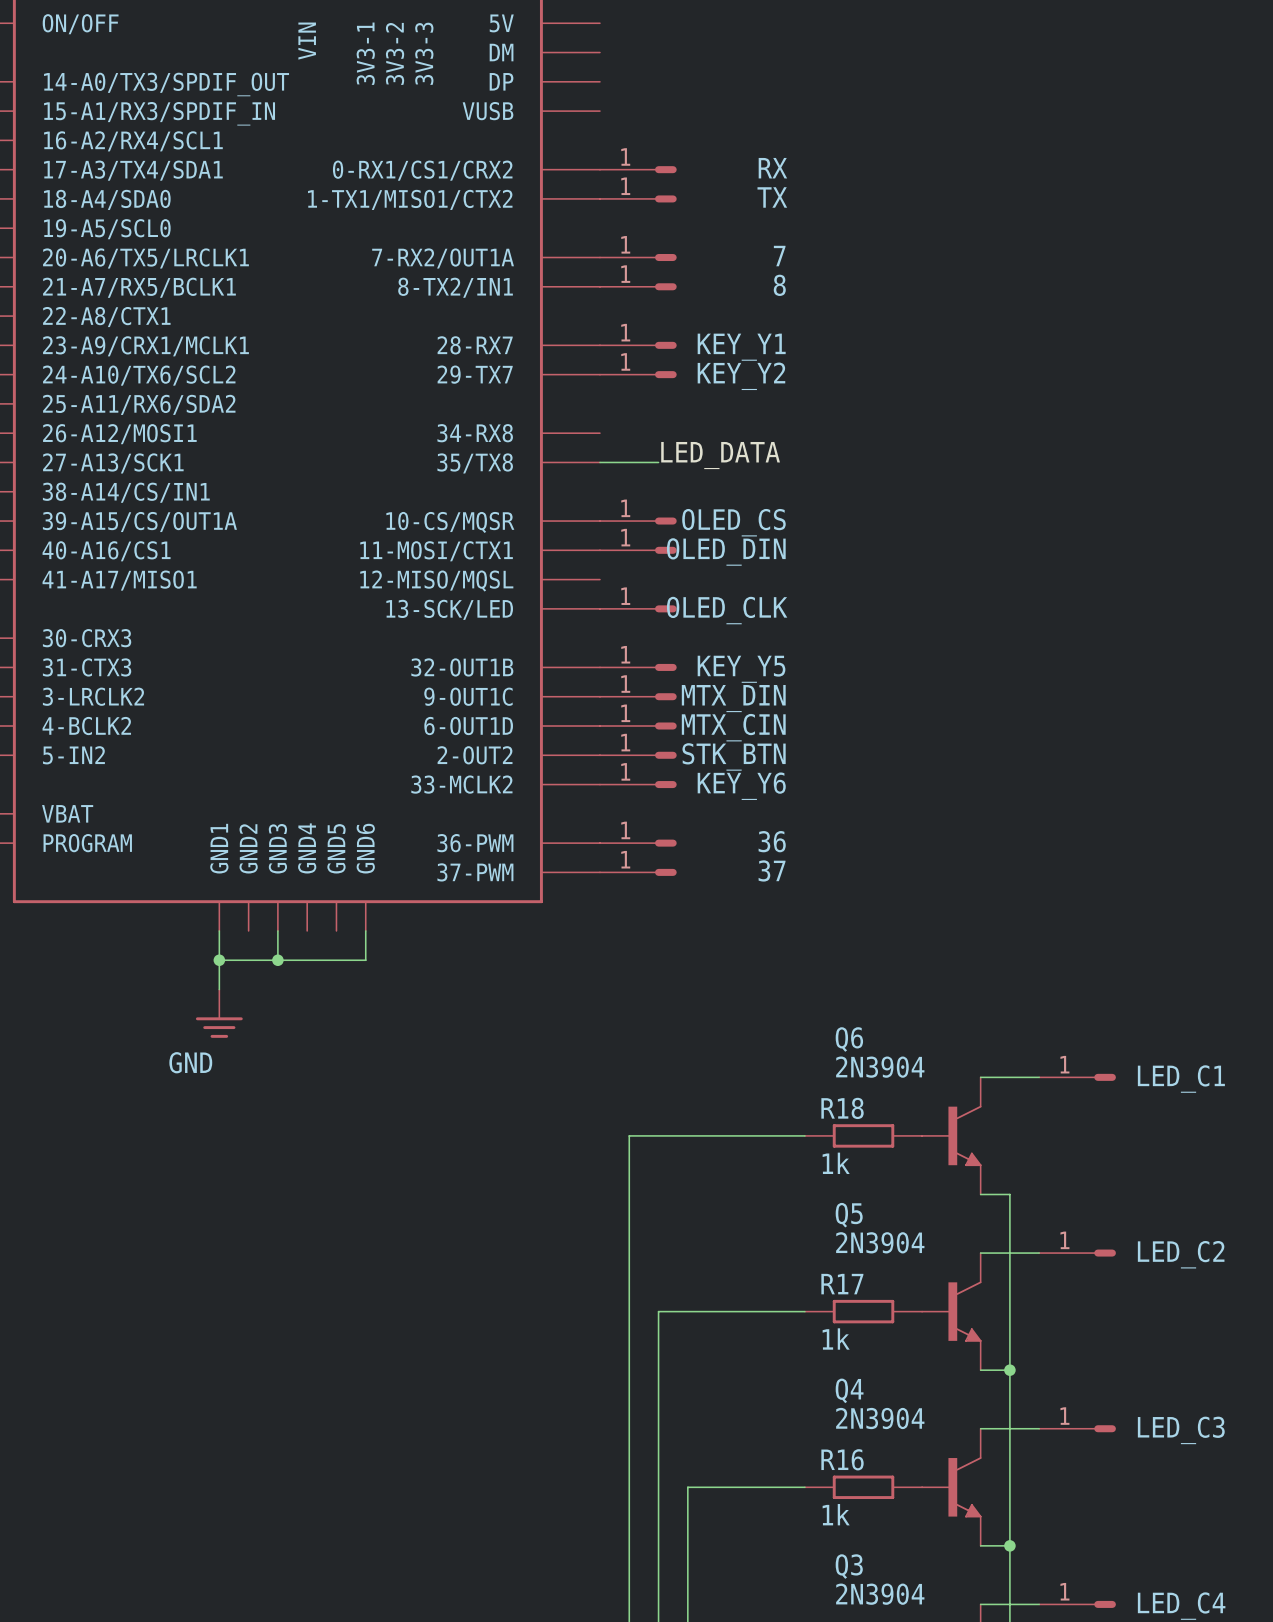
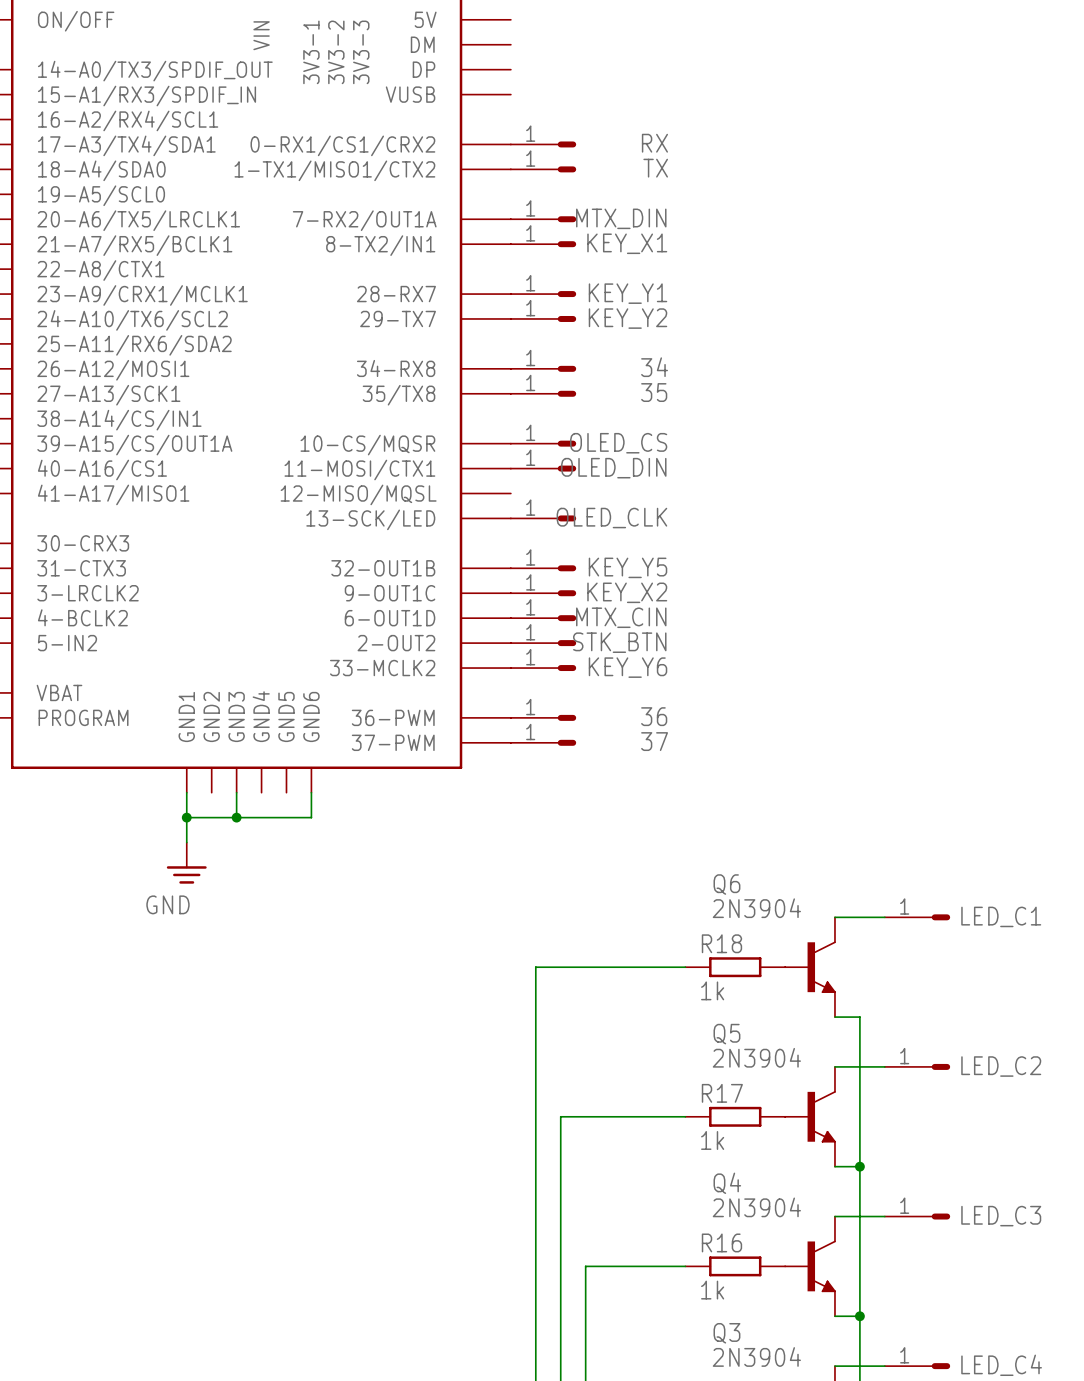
7 name: 7 (779, 256) -> MTX_DIN (621, 218)
8 name: 8 (779, 285) -> KEY_X1 (627, 243)
34: none -> (543, 368)
label: LED_DATA (720, 455) -> none
35: none -> (543, 393)
MTX_DIN name: MTX_DIN (733, 698) -> KEY_X2 (627, 592)

